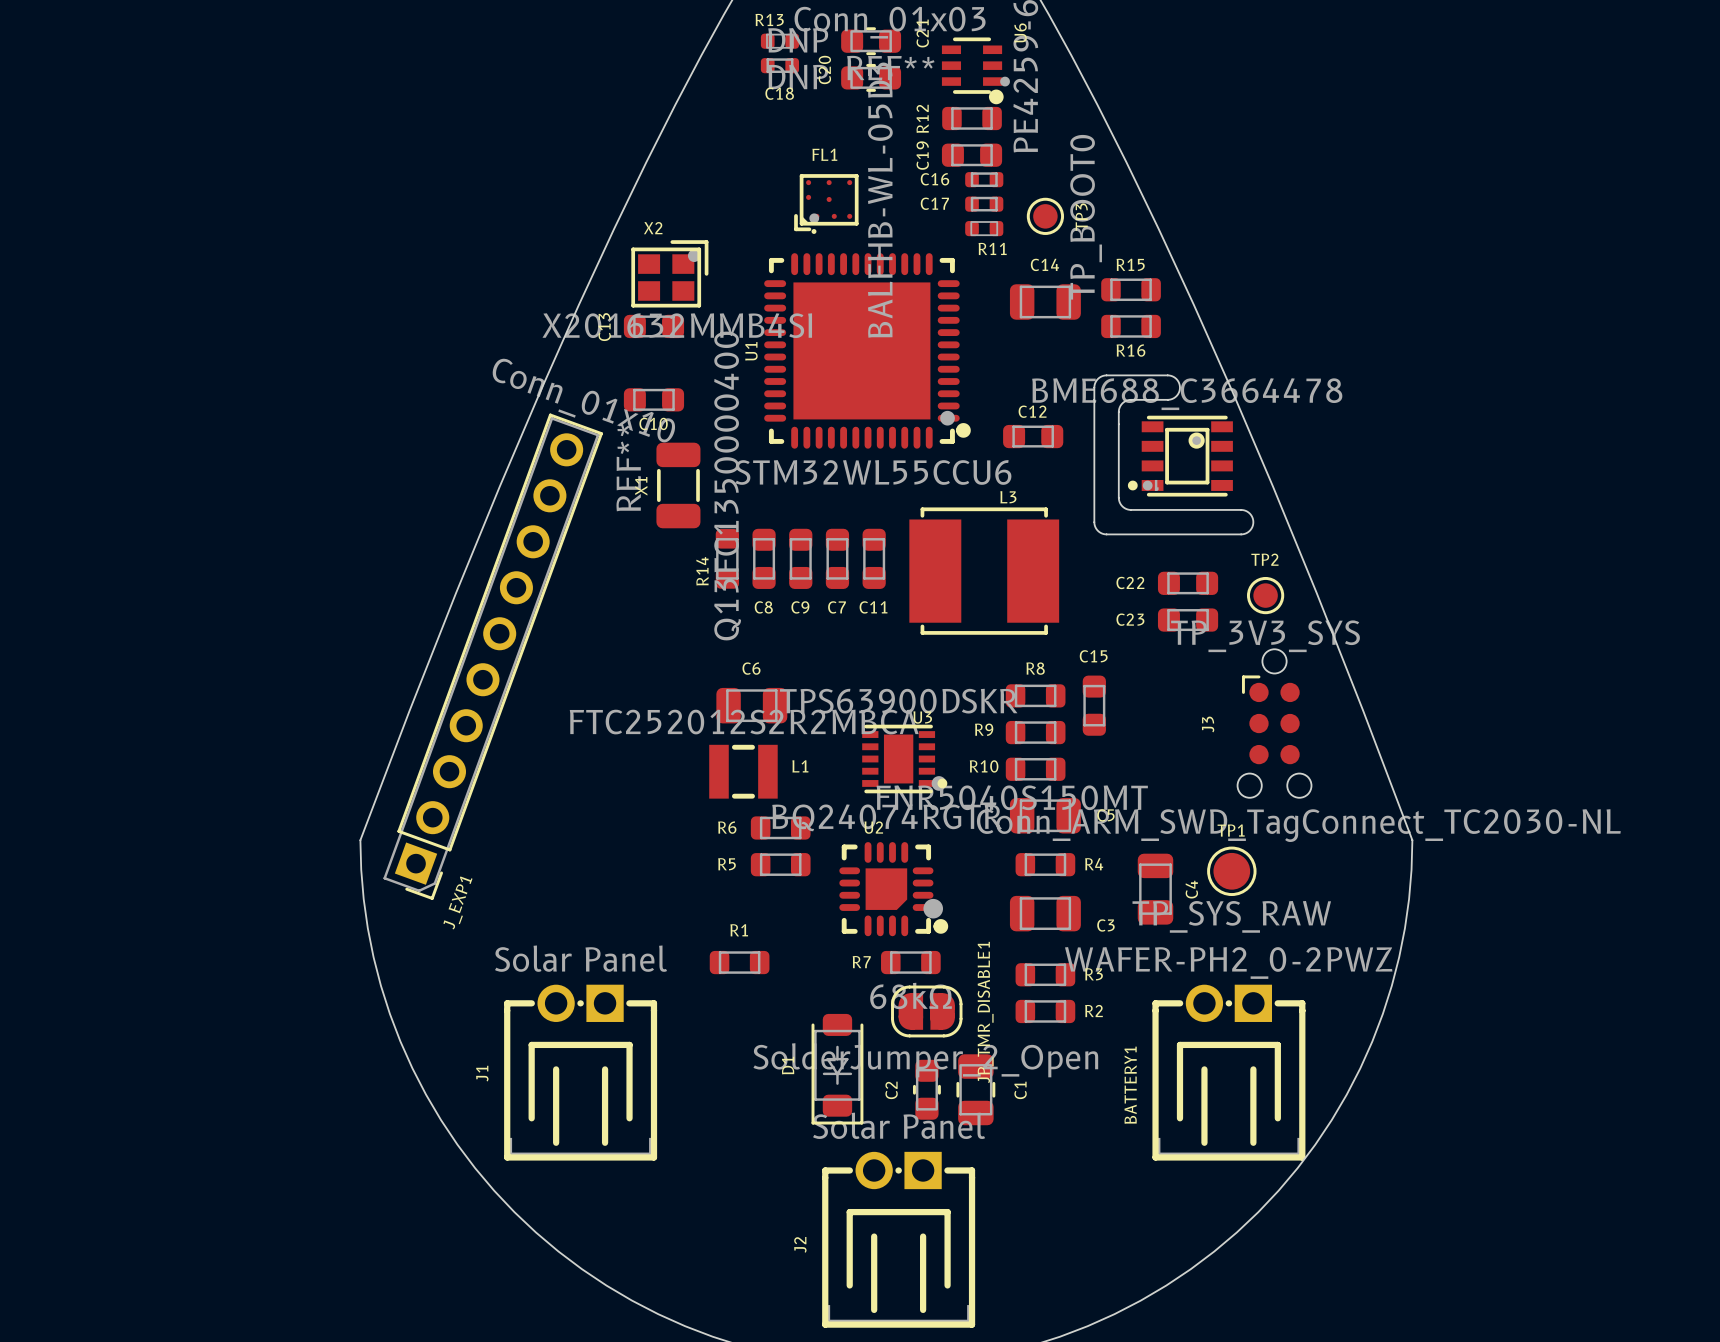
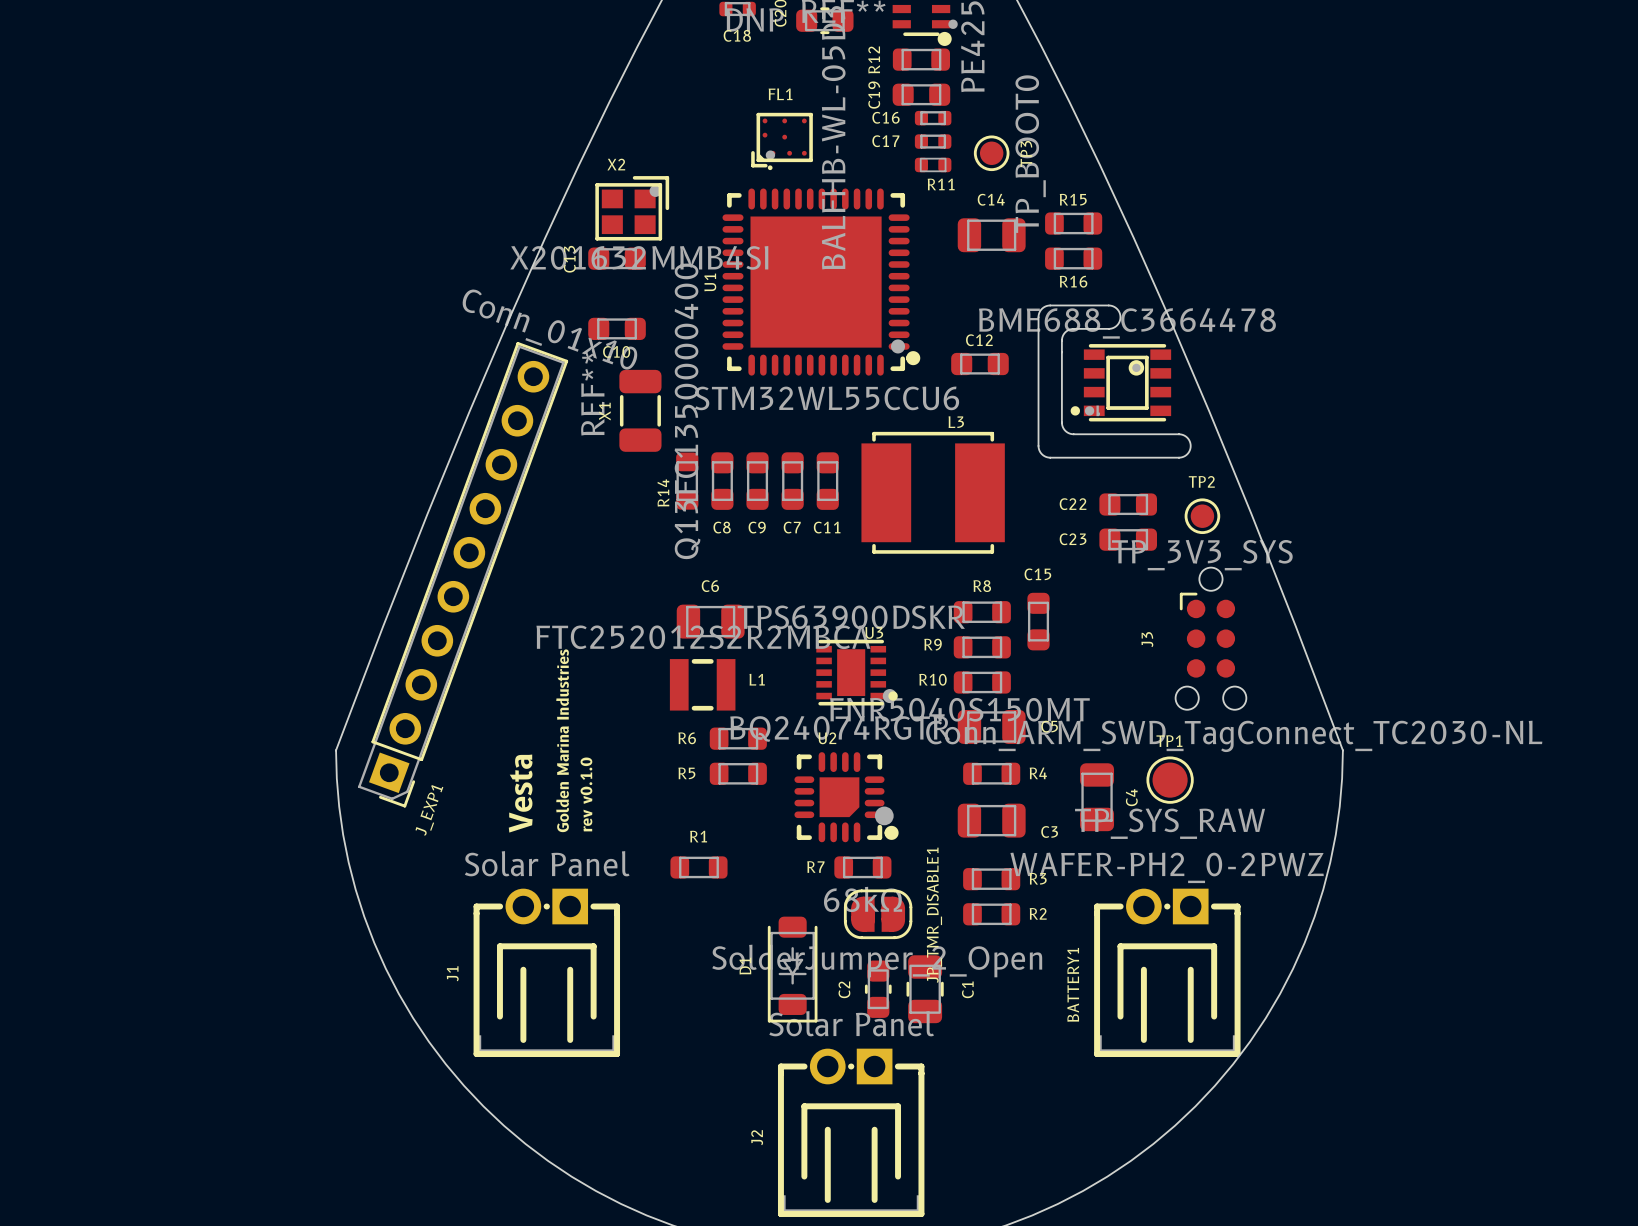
text: none -> Golden Marina Industries (562, 740)
text: none -> Vesta (520, 793)
text: none -> rev v0.1.0 (586, 794)

